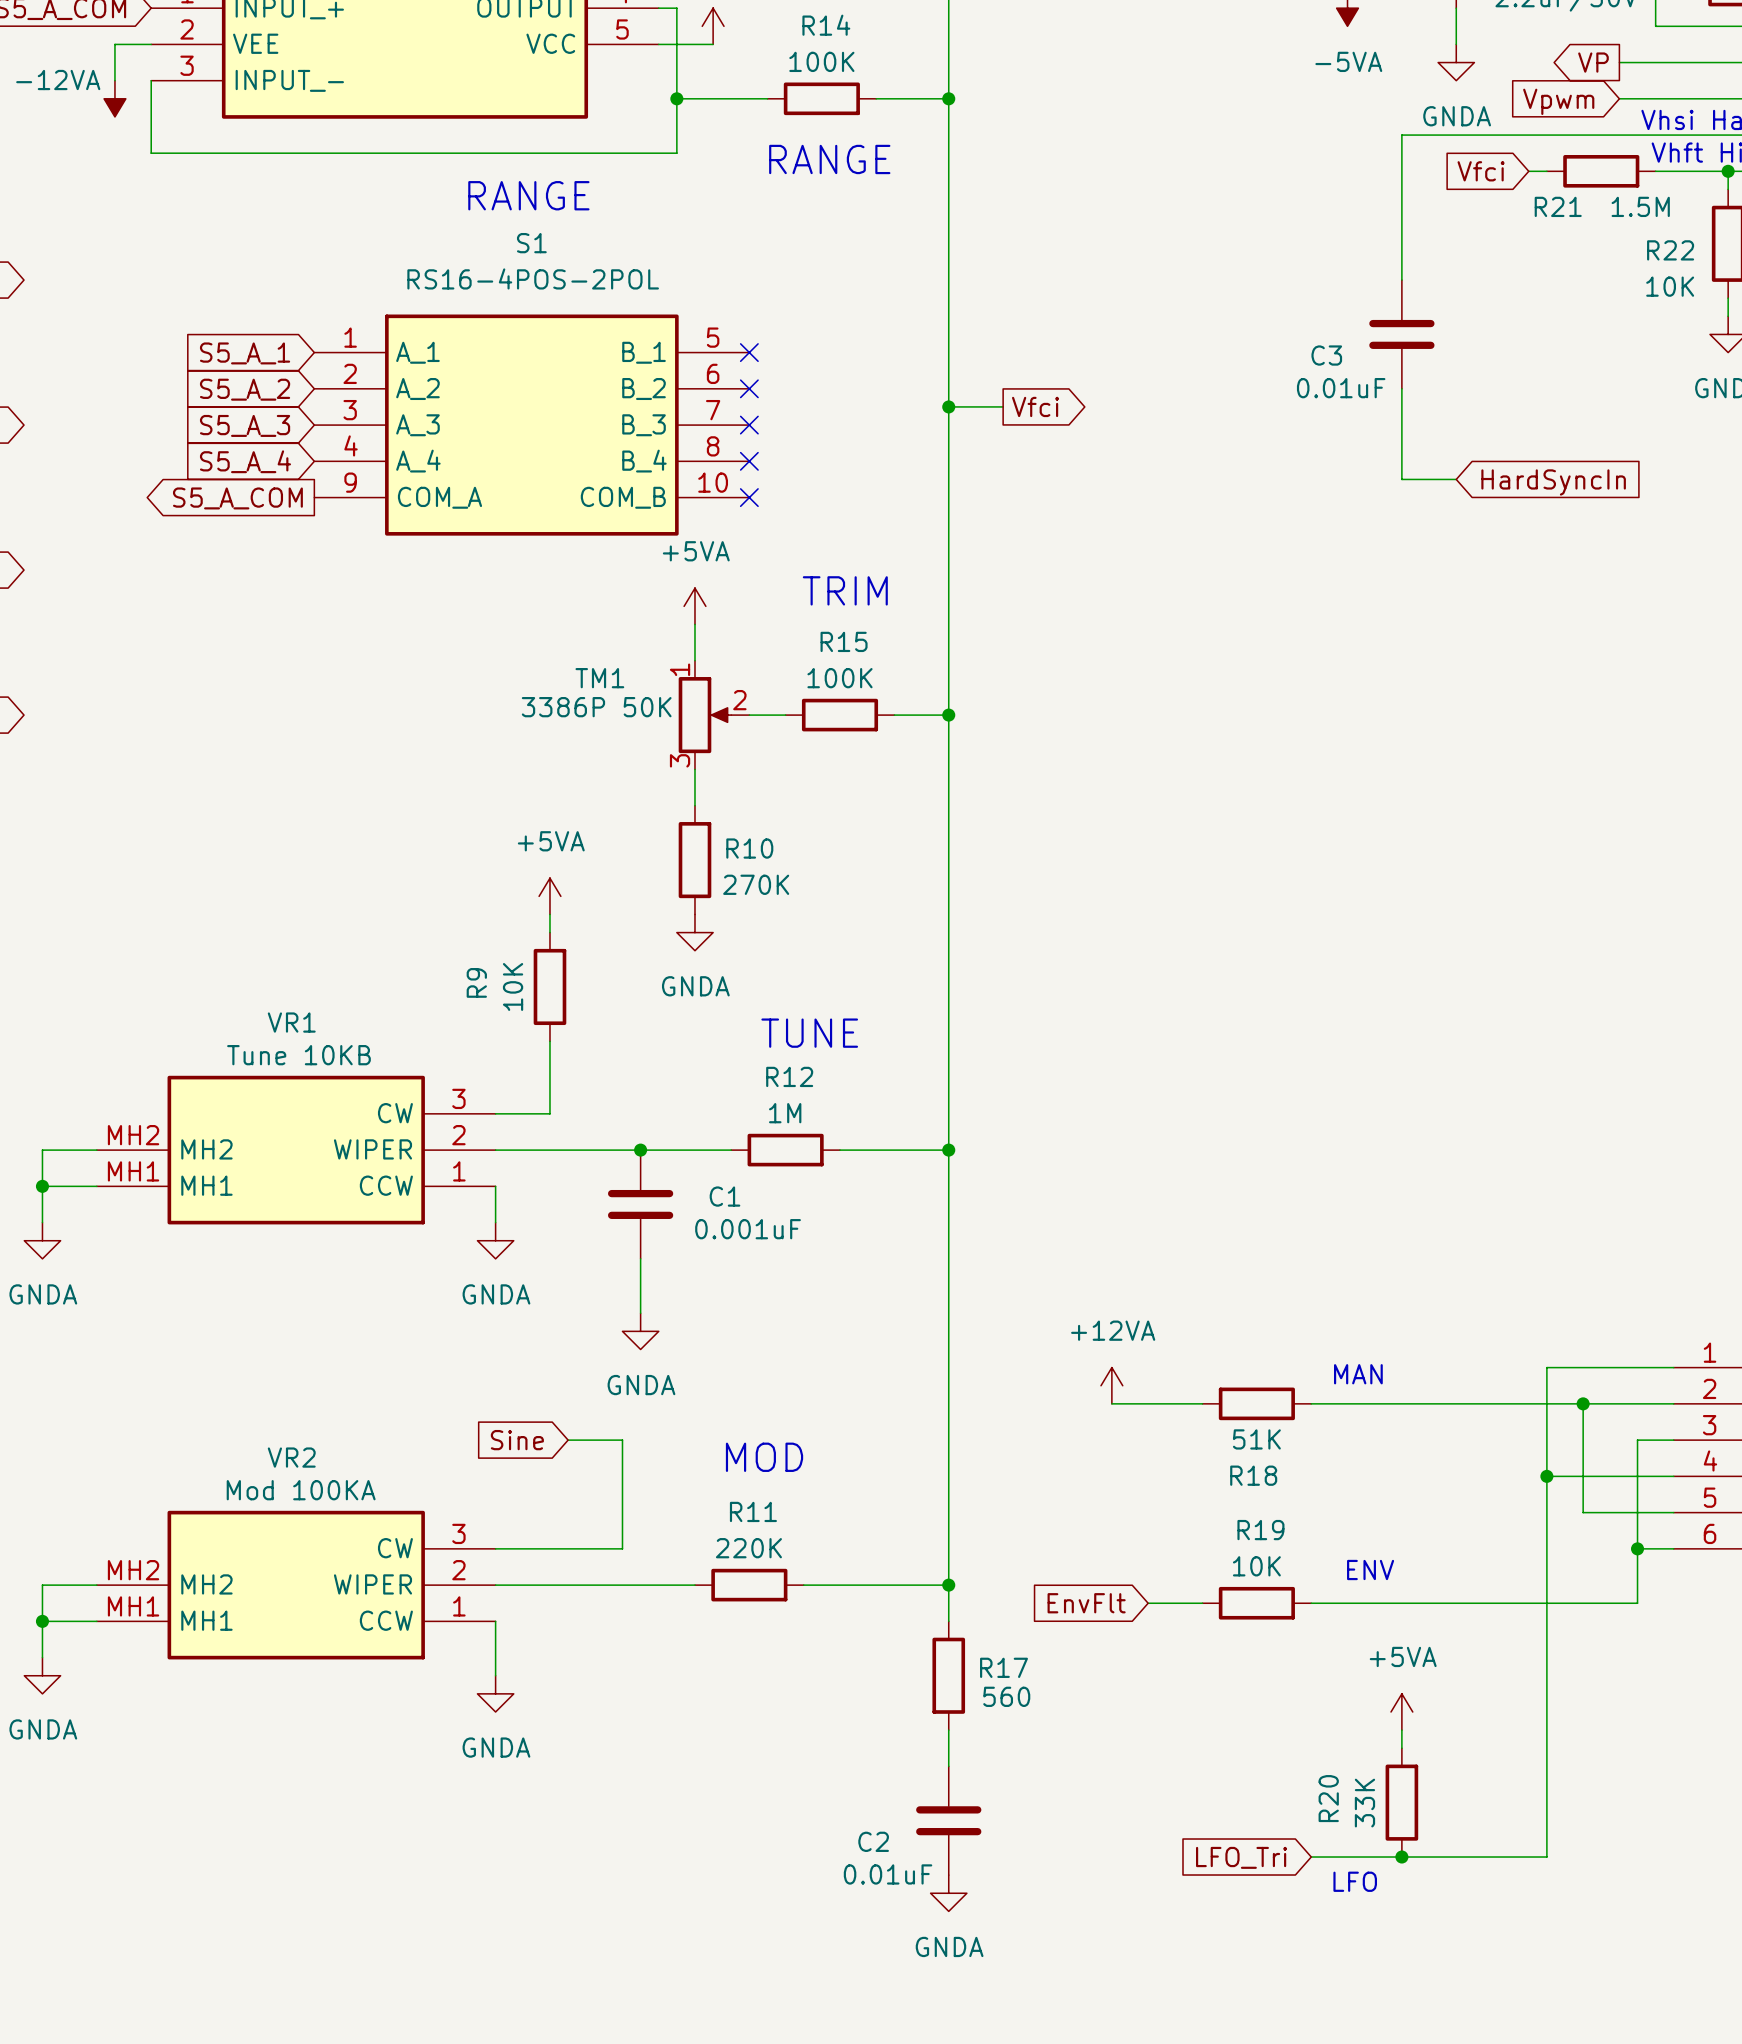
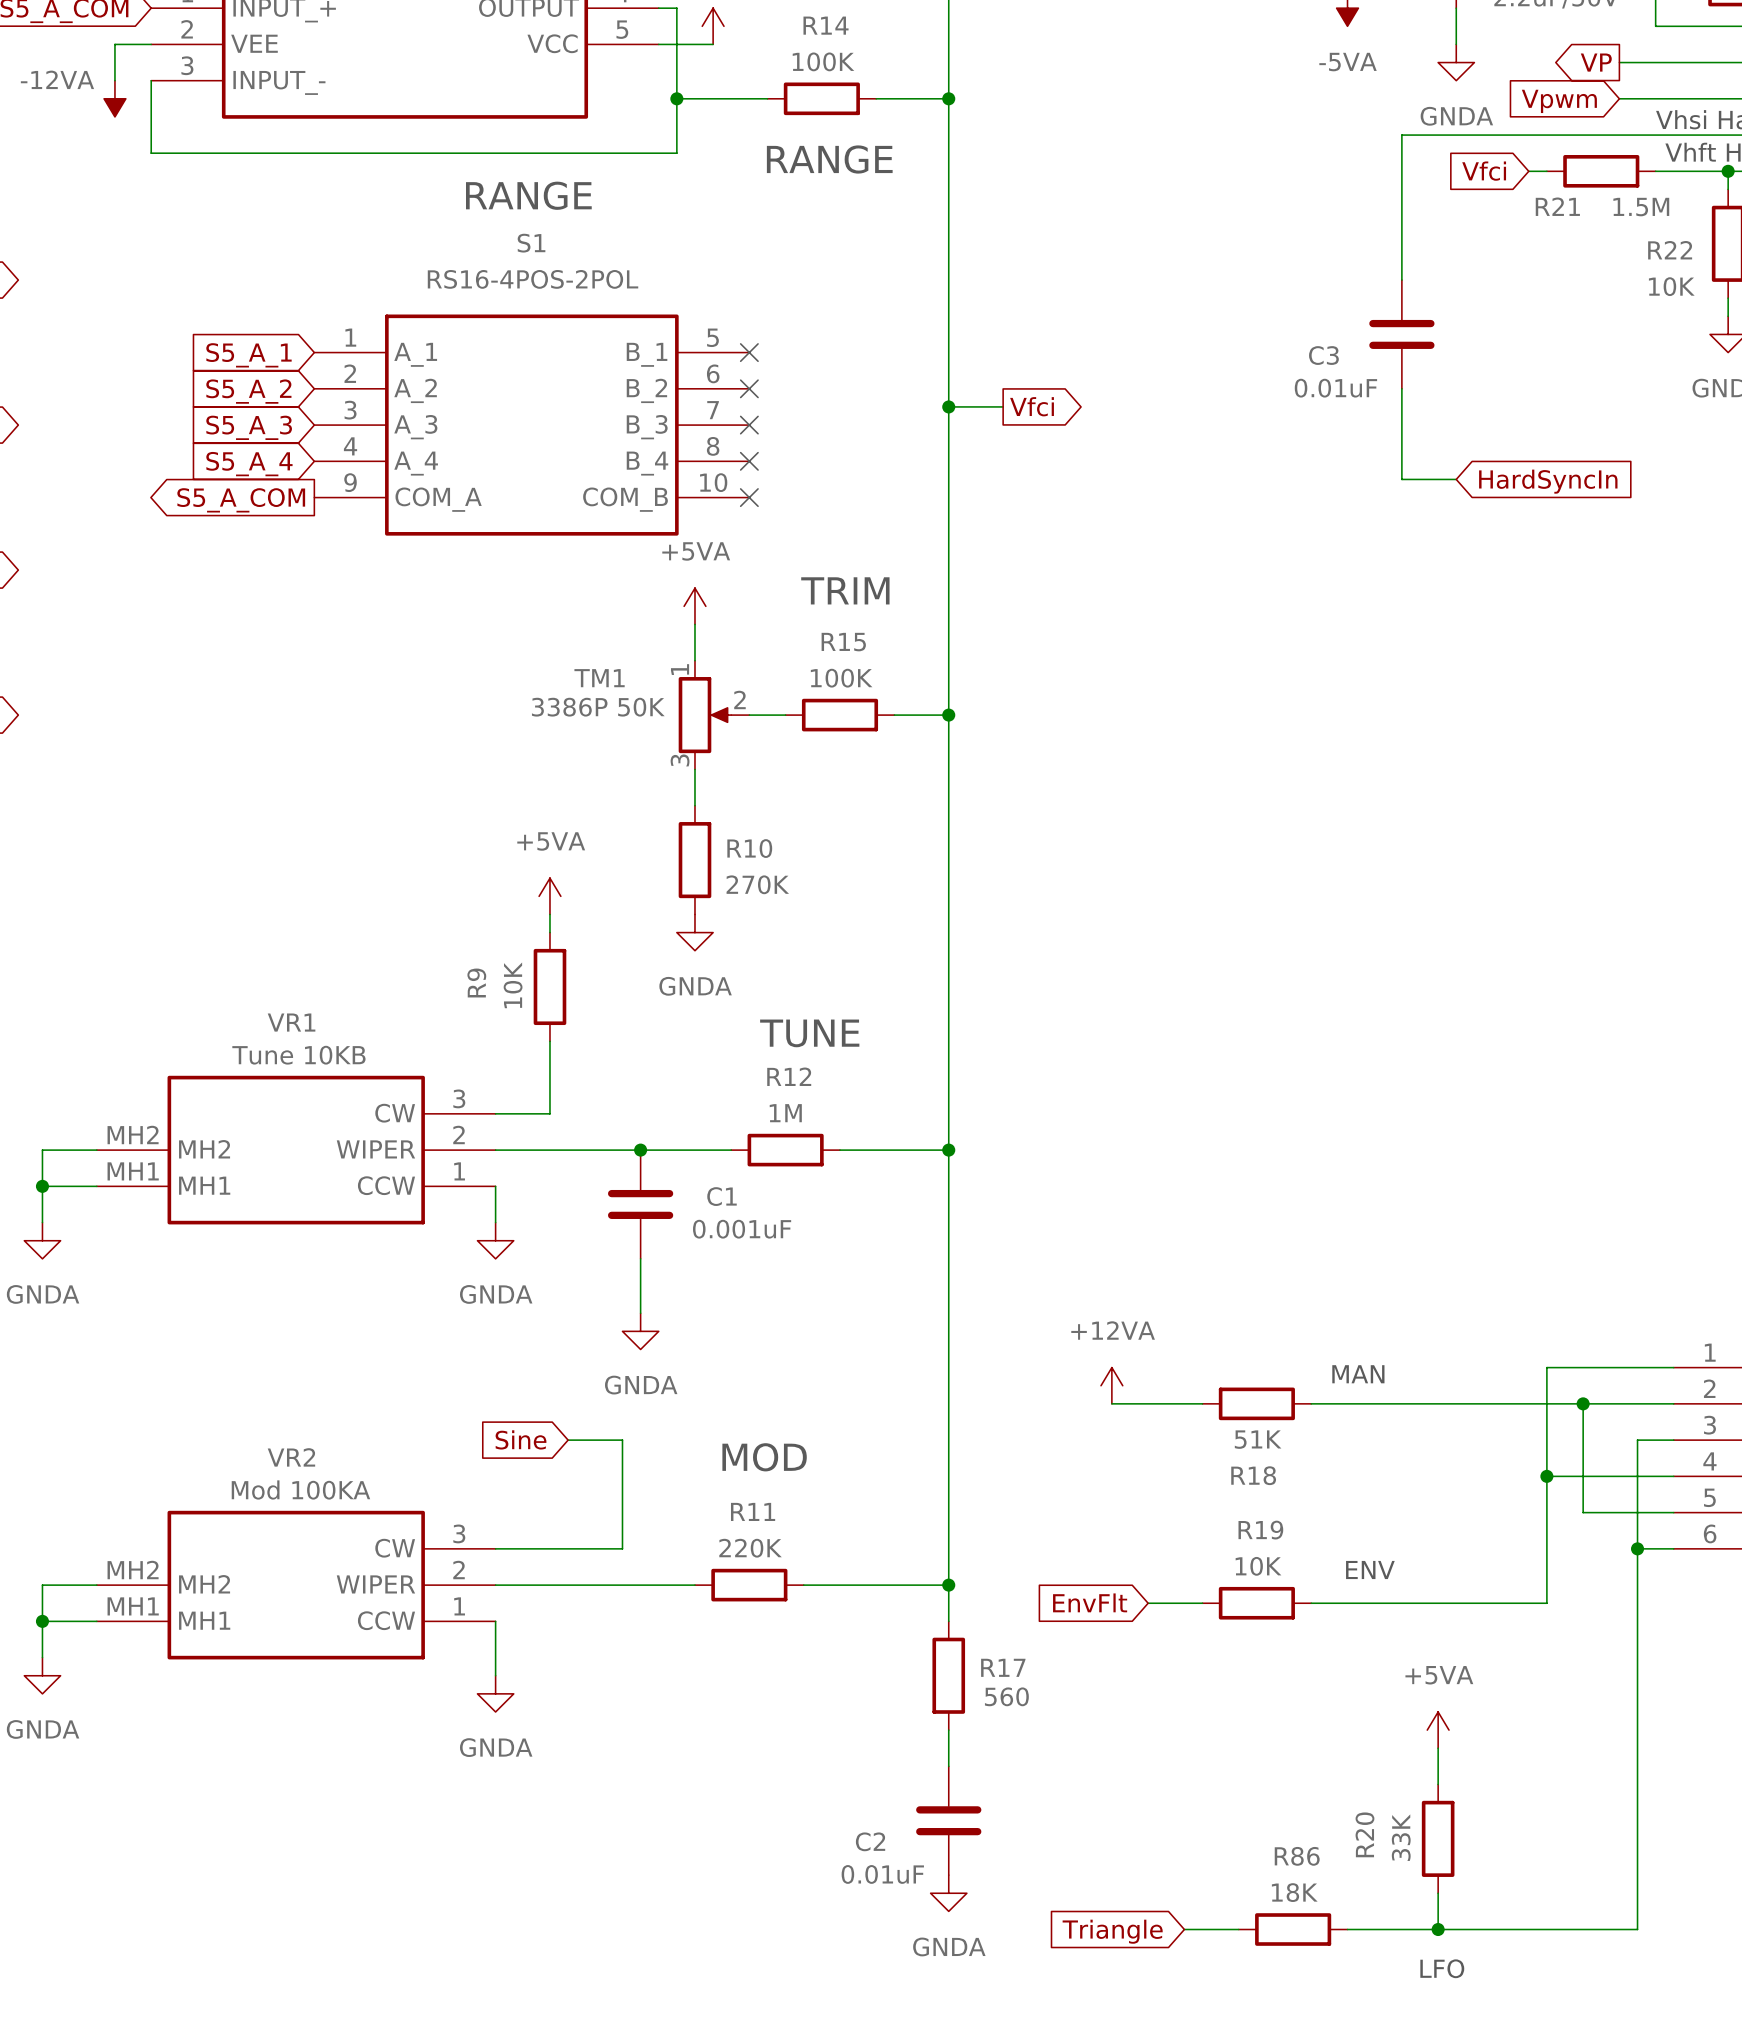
wire: (1637, 1603) (1546, 1603) (1546, 1857) (1311, 1857) -> (1637, 1603) (1637, 1929) (1347, 1929)
power symbol position: +5VA (1401, 1712) -> +5VA (1438, 1730)
wire: (1401, 1730) (1401, 1748) -> none
wire: none -> (1438, 1748) (1438, 1784)
R20 position: (1401, 1802) -> (1438, 1838)
global label: LFO_Tri (1241, 1857) -> none
junction position: (1401, 1857) -> (1438, 1929)
text position: LFO (1355, 1881) -> LFO (1442, 1968)
wire: none -> (1438, 1893) (1438, 1929)
wire: none -> (1184, 1929) (1238, 1929)
R86: none -> 18K (1293, 1929)
global label: none -> Triangle (1112, 1931)

